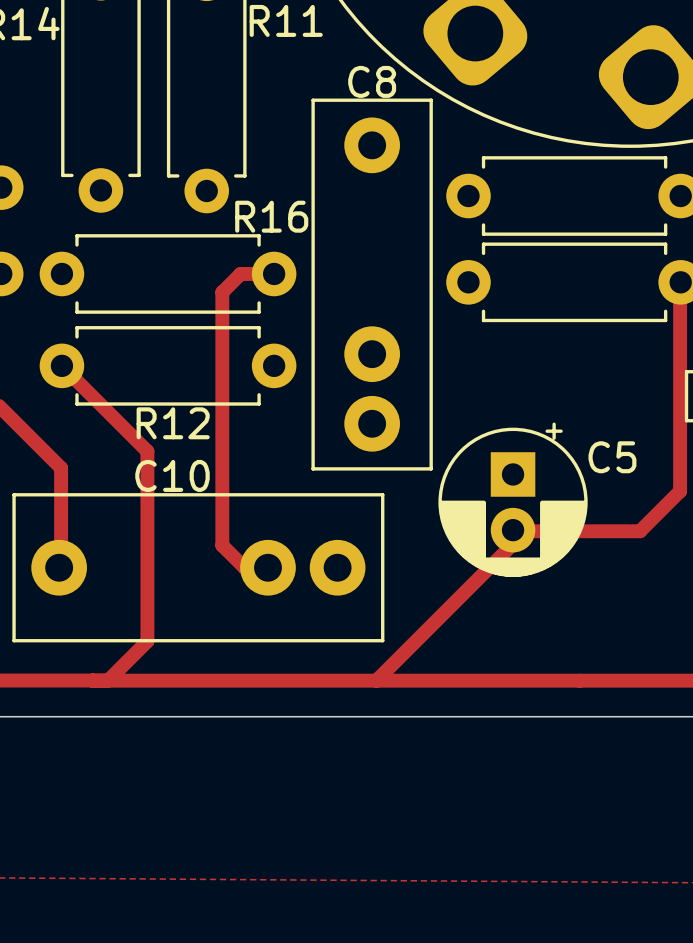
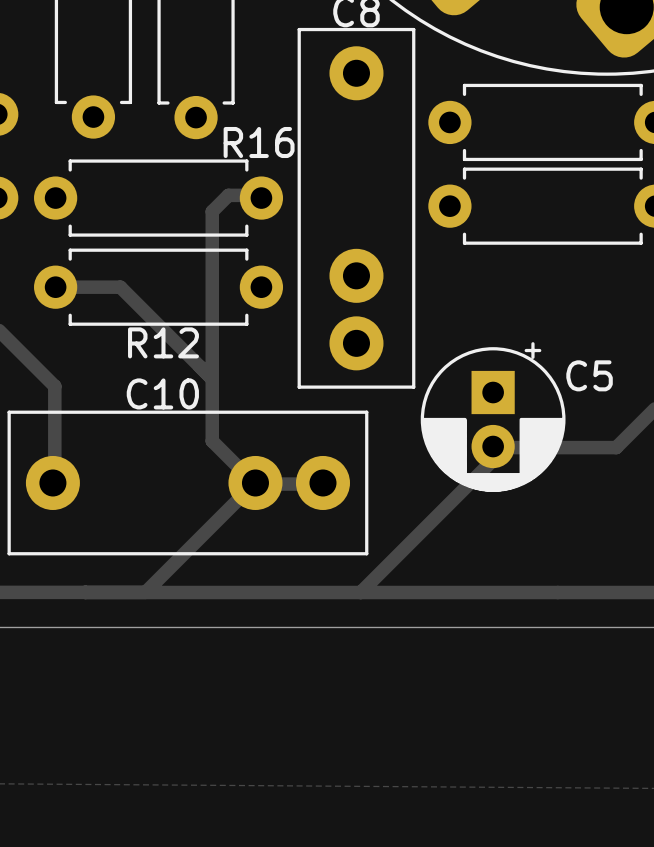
track: none -> (261, 195) (228, 195) (212, 211) (212, 441) (255, 484)
track: (274, 273) (240, 273) (222, 292) (222, 545) (244, 567) (268, 567) -> none
track: (61, 365) (147, 451) (147, 641) (108, 680) -> (55, 287) (120, 287) (212, 379)
track: none -> (321, 484) (253, 484) (145, 592) (100, 592)

